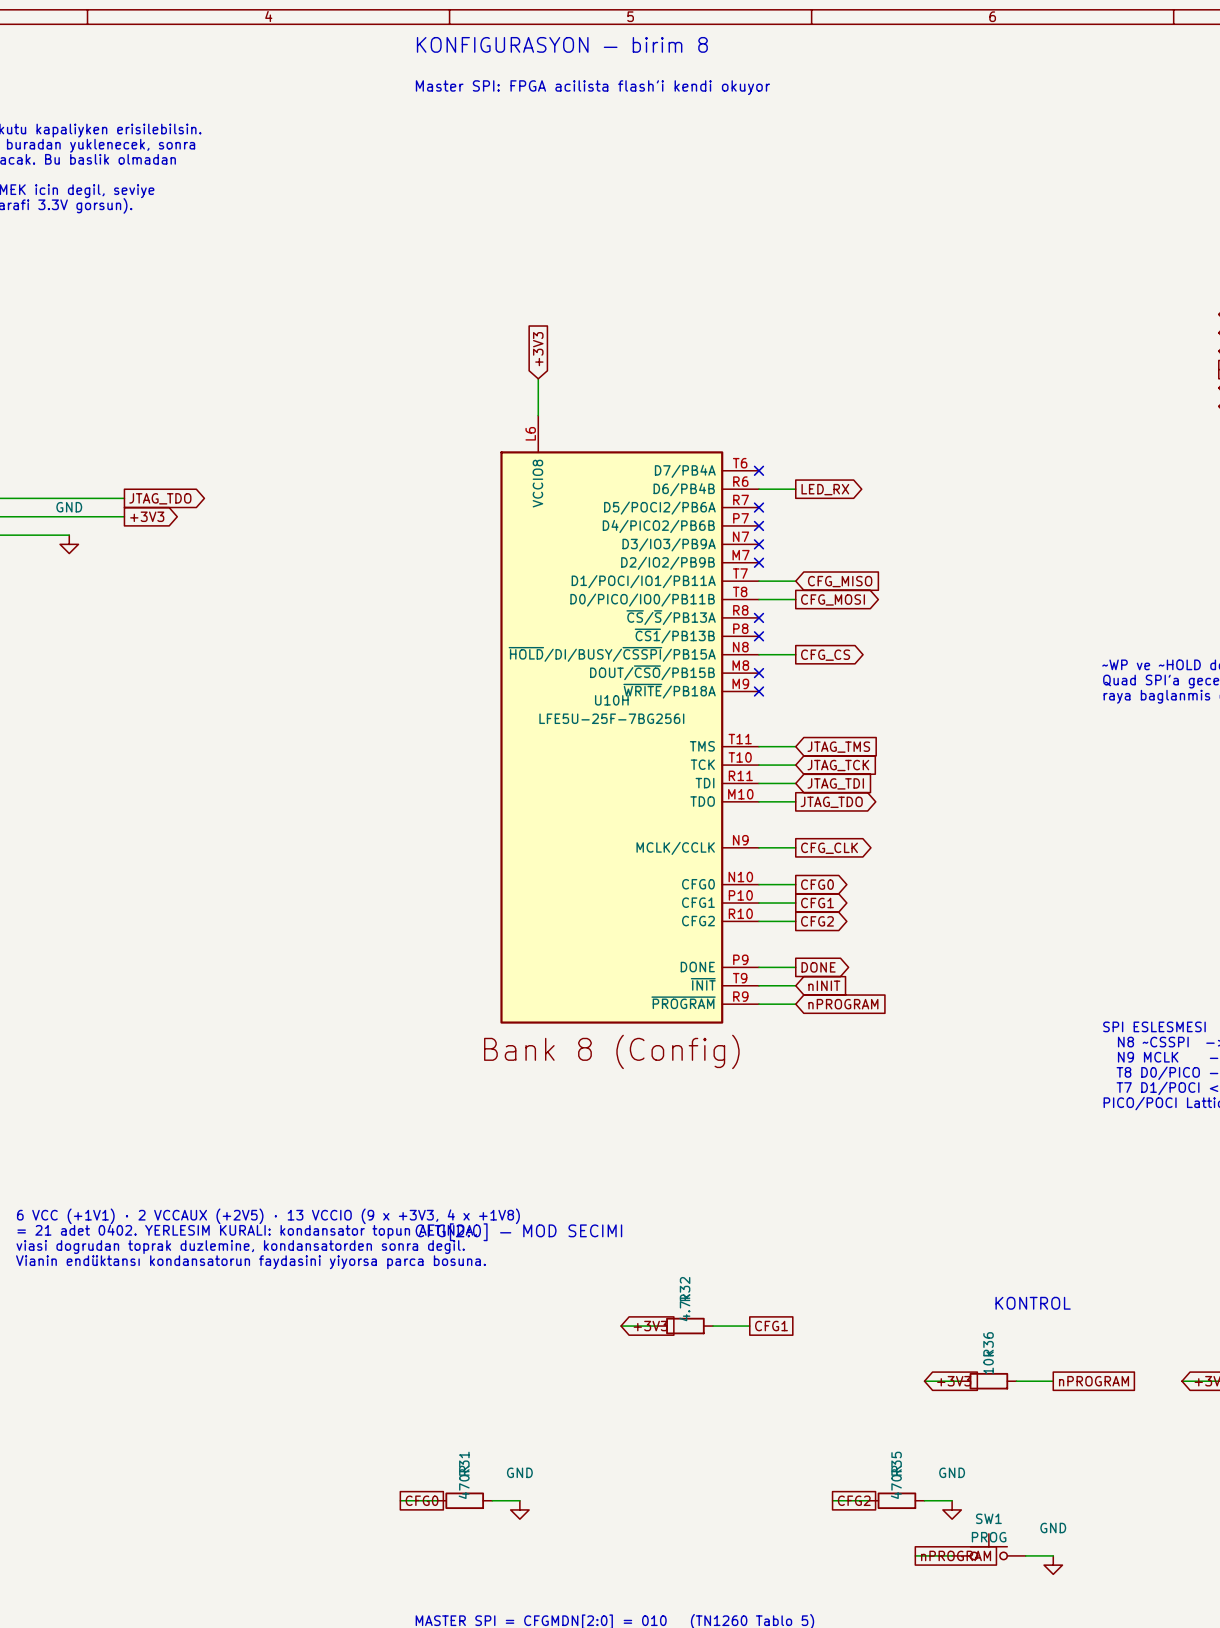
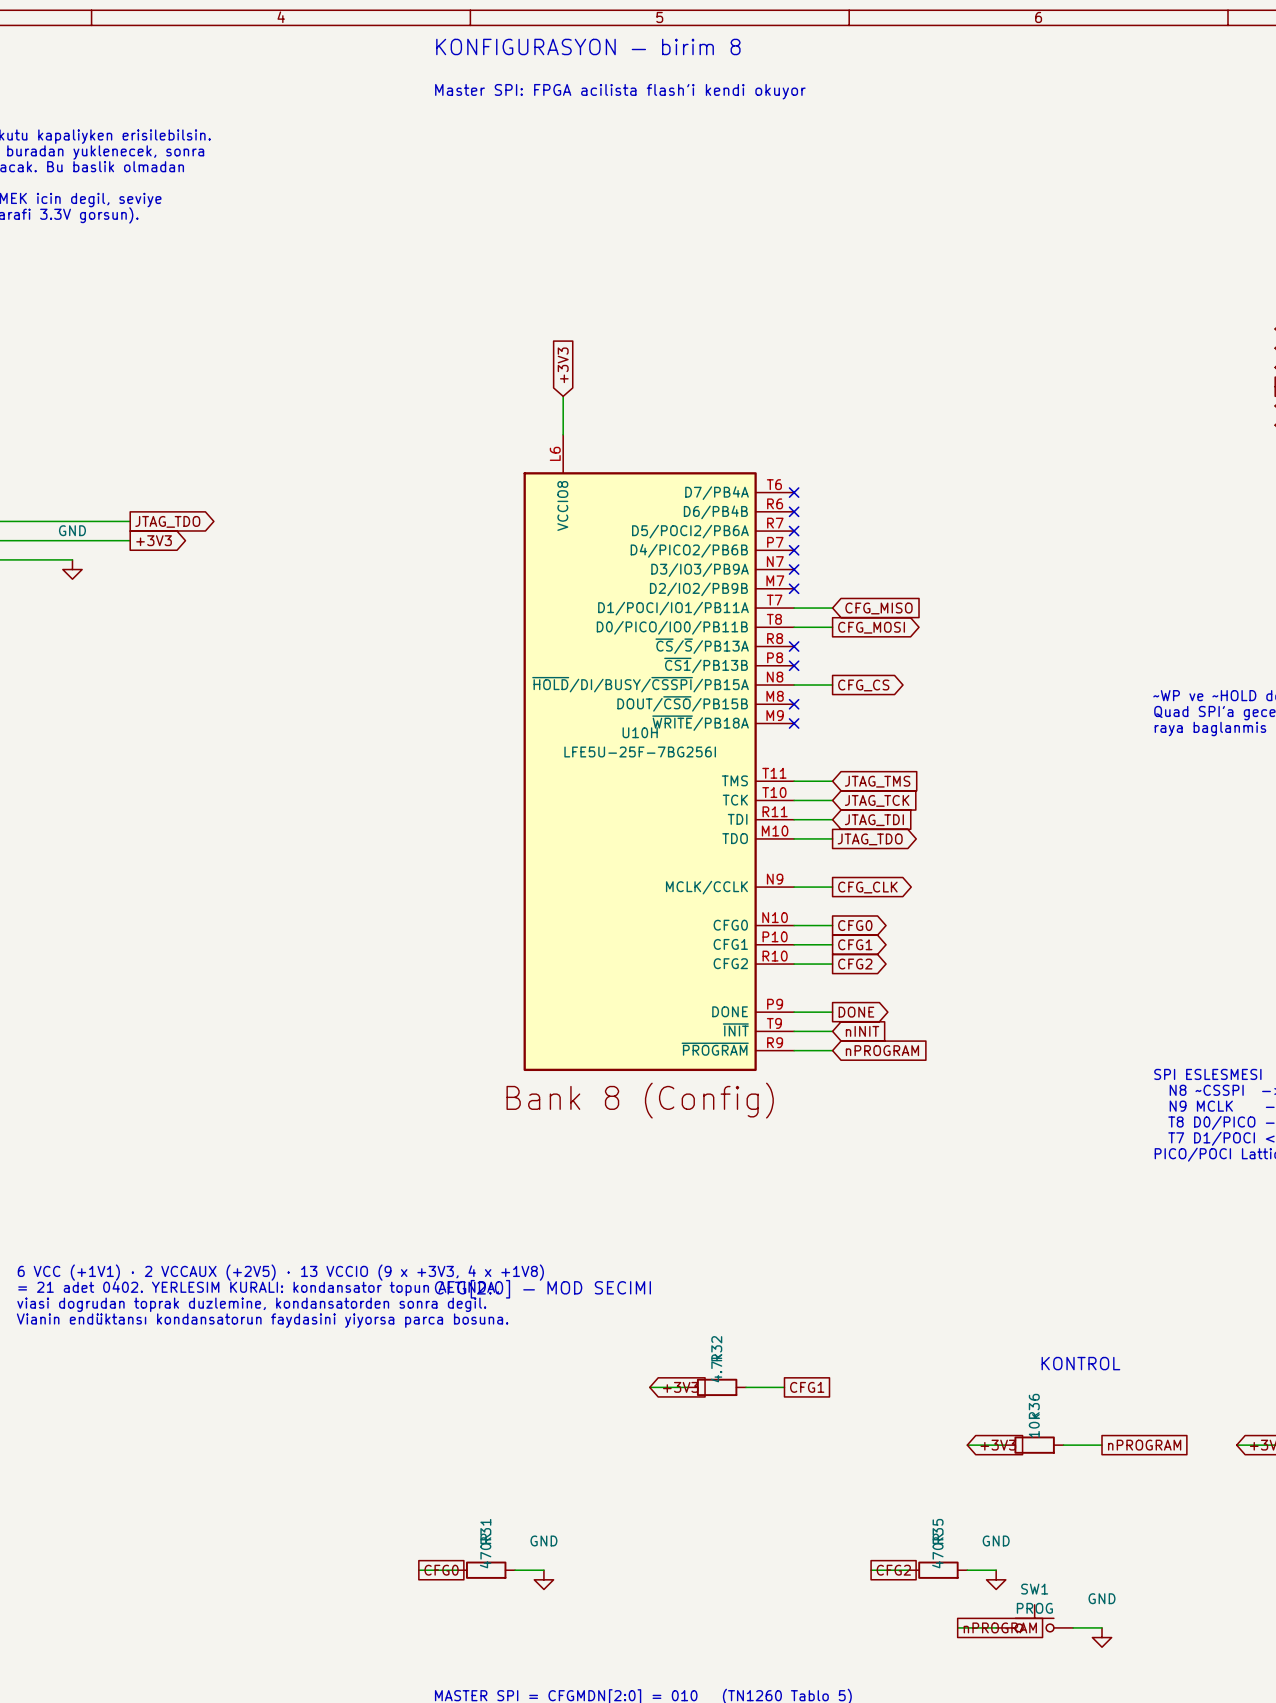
wire: (758, 489) (795, 489) -> none
no-connect mark: none -> (794, 511)
global label: LED_RX (825, 489) -> none

